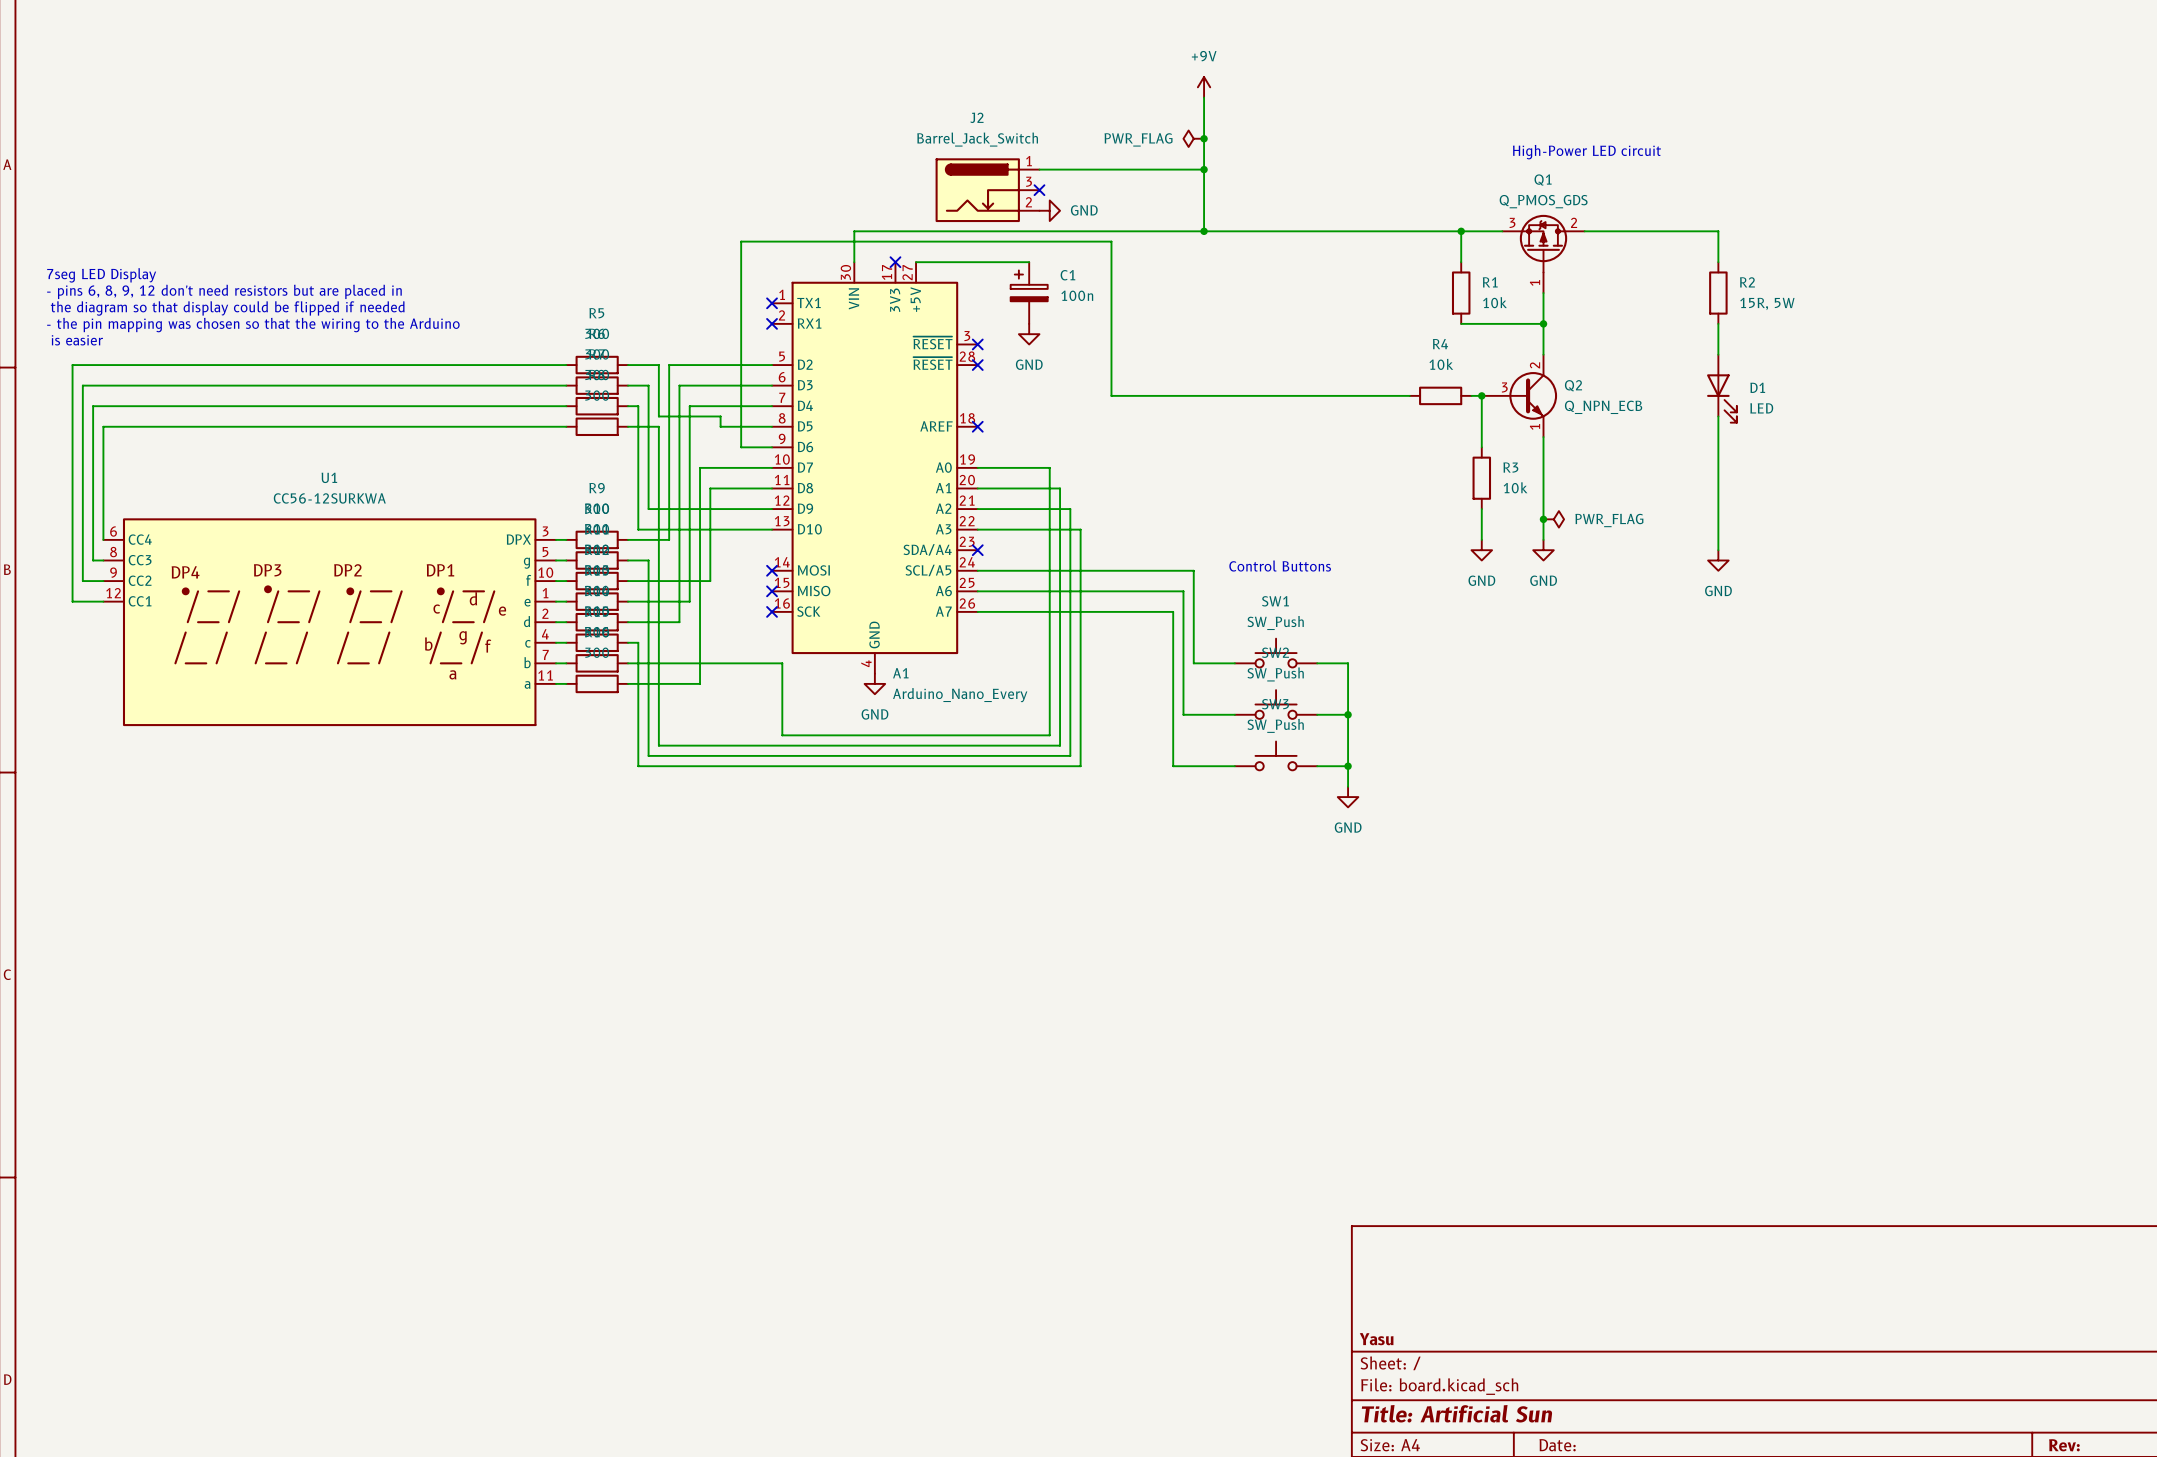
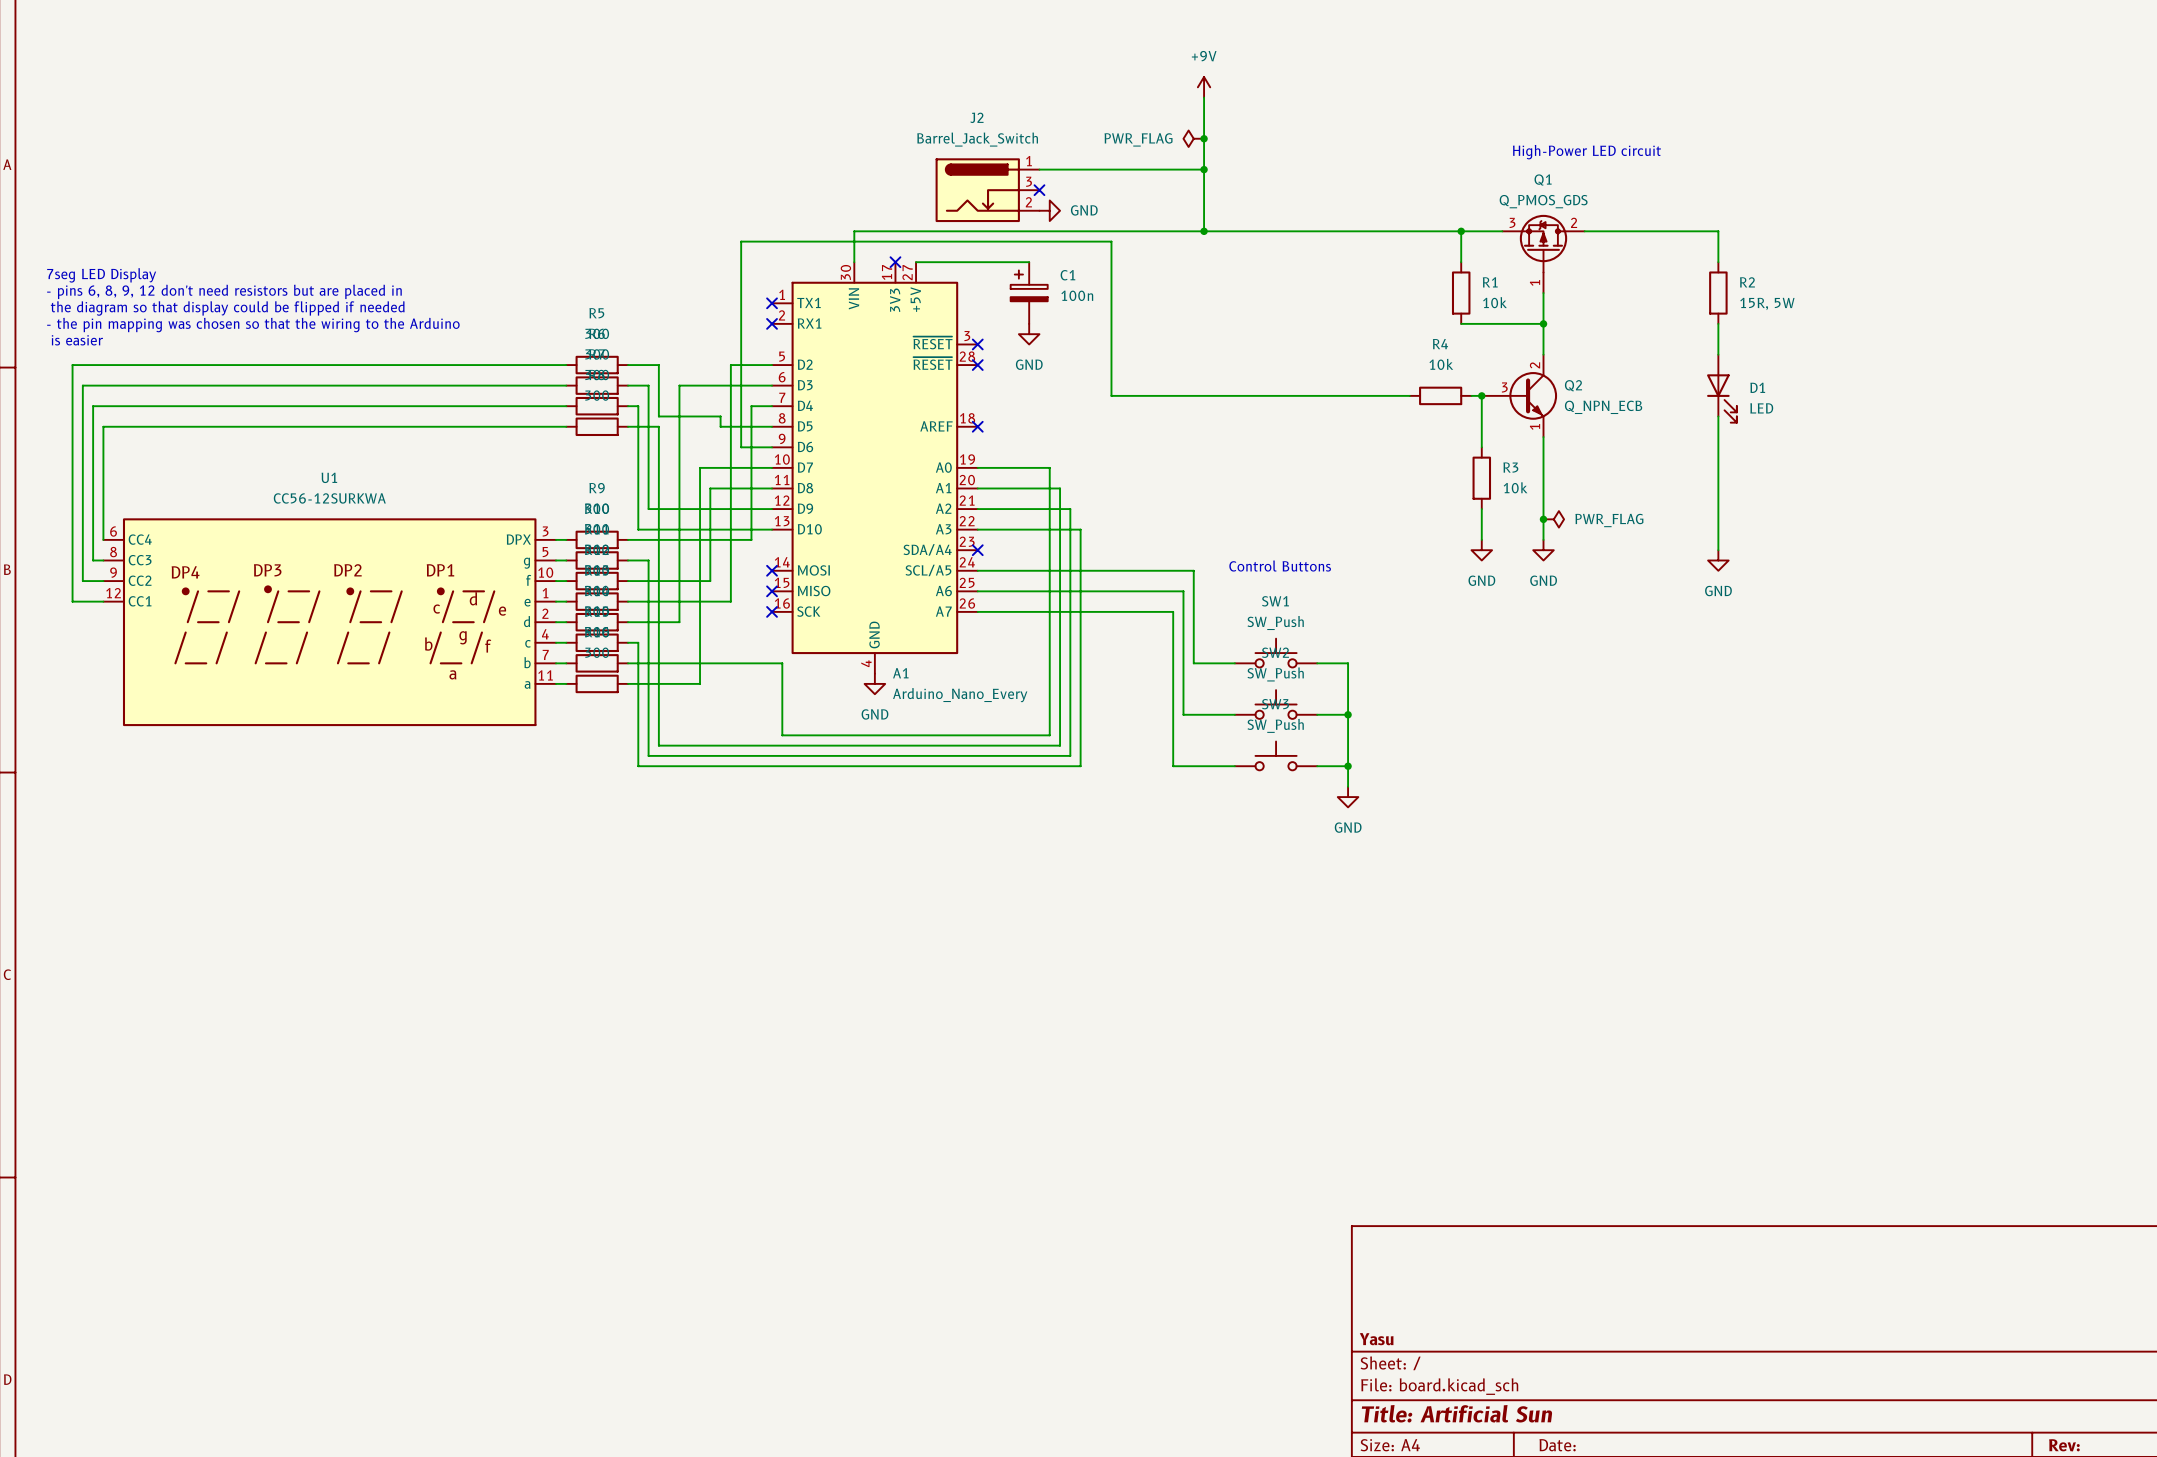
wire: (730, 365) (669, 365) (669, 539) -> (751, 406) (751, 539) (669, 539)
wire: (751, 406) (689, 406) (689, 601) -> (730, 365) (730, 601) (689, 601)

